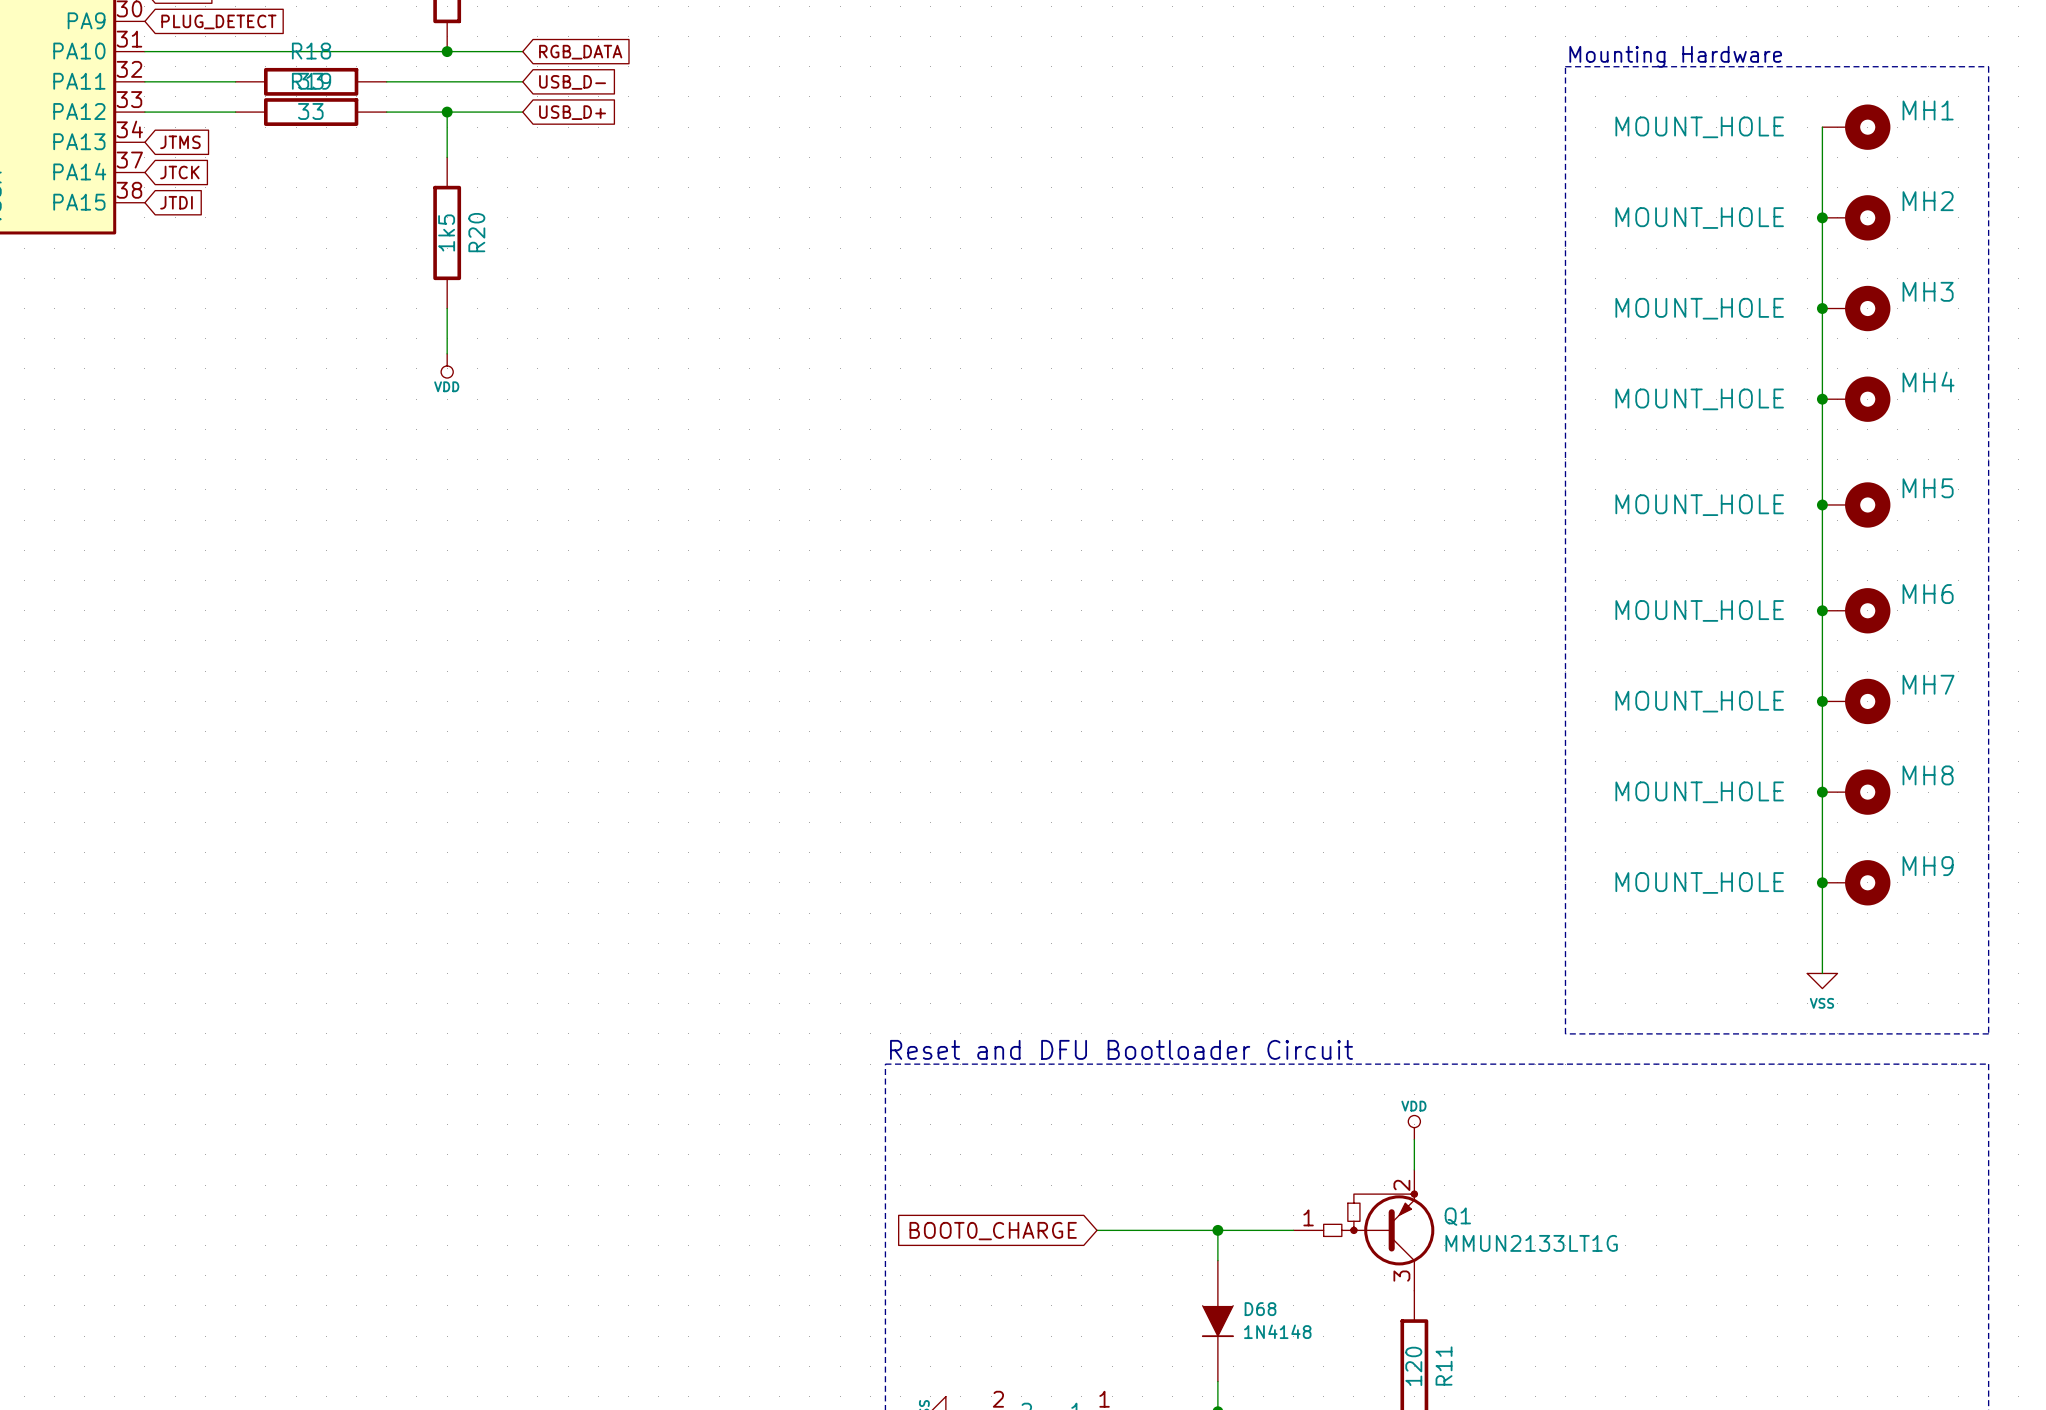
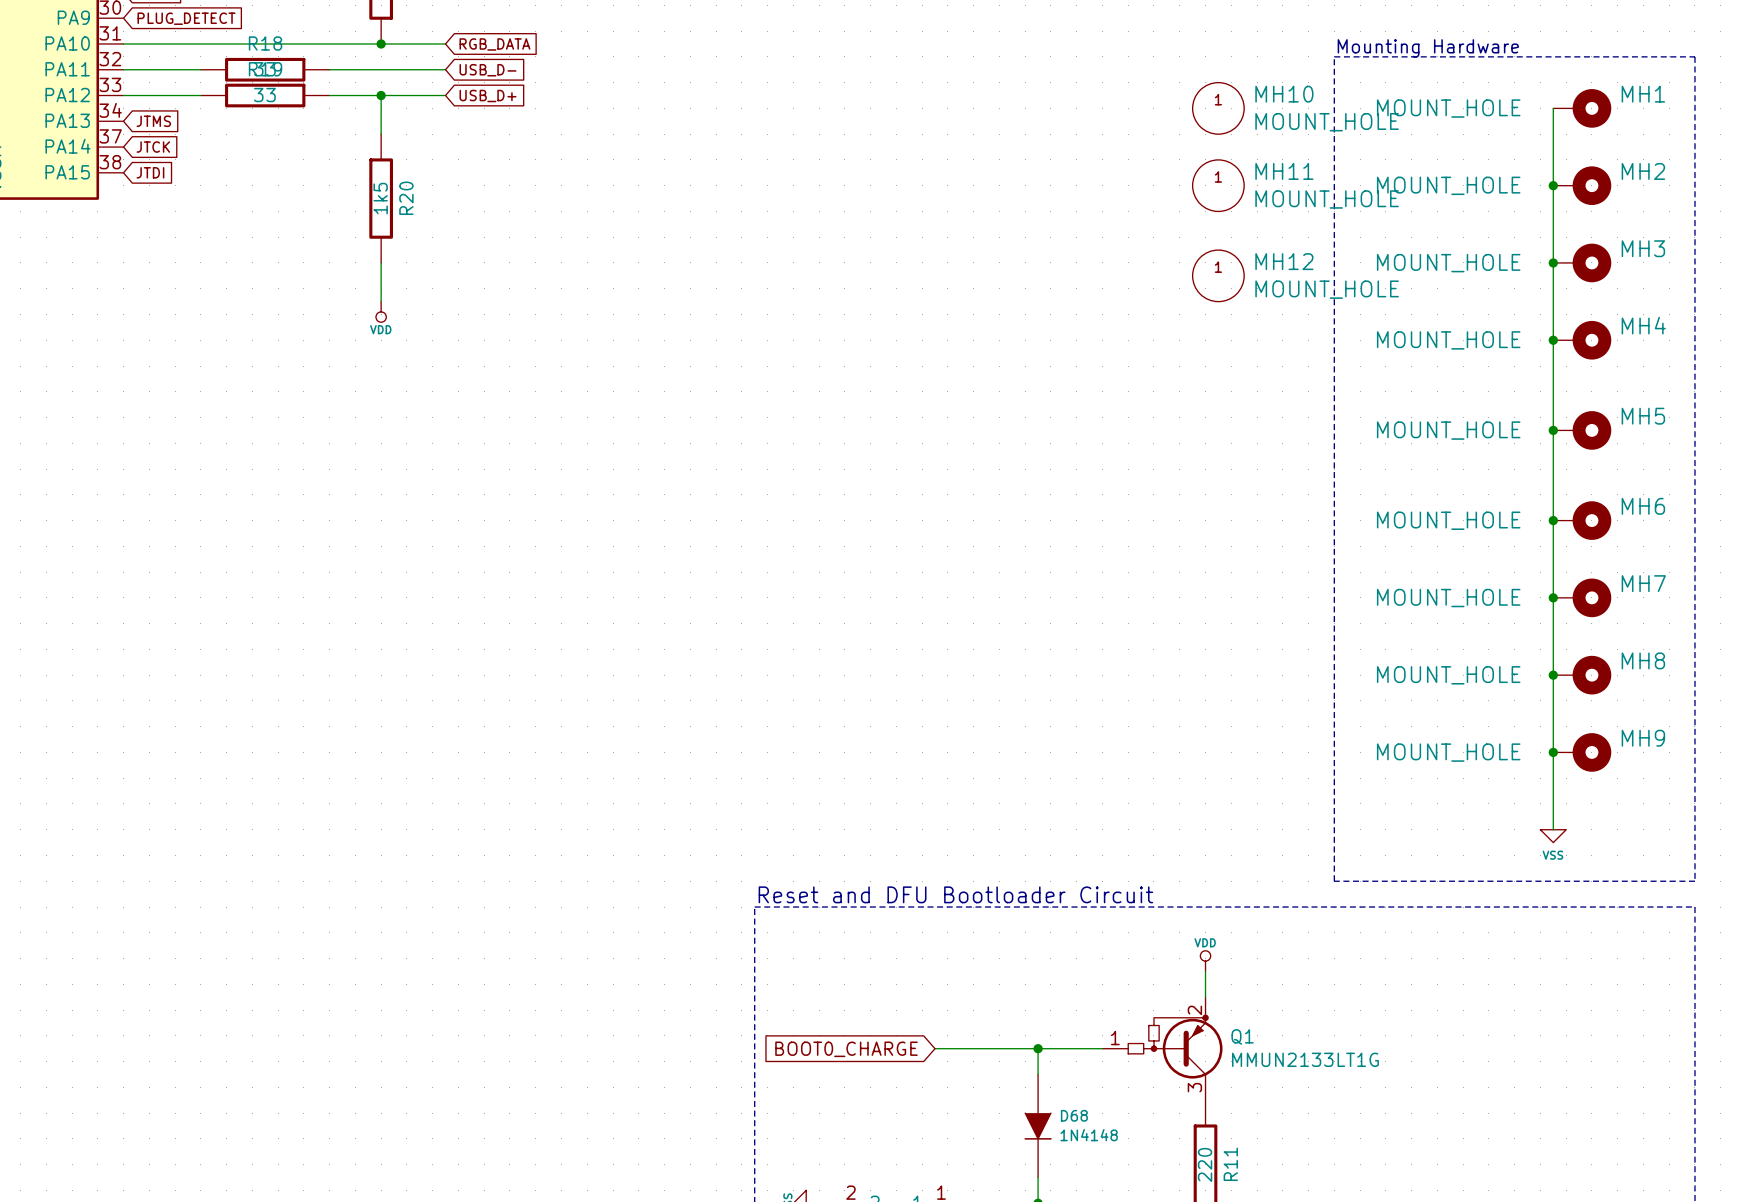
MH10: none -> MOUNT_HOLE (1218, 108)
MH11: none -> MOUNT_HOLE (1218, 185)
MH12: none -> MOUNT_HOLE (1218, 275)
R11 value: 120 (1413, 1366) -> 220 (1205, 1164)

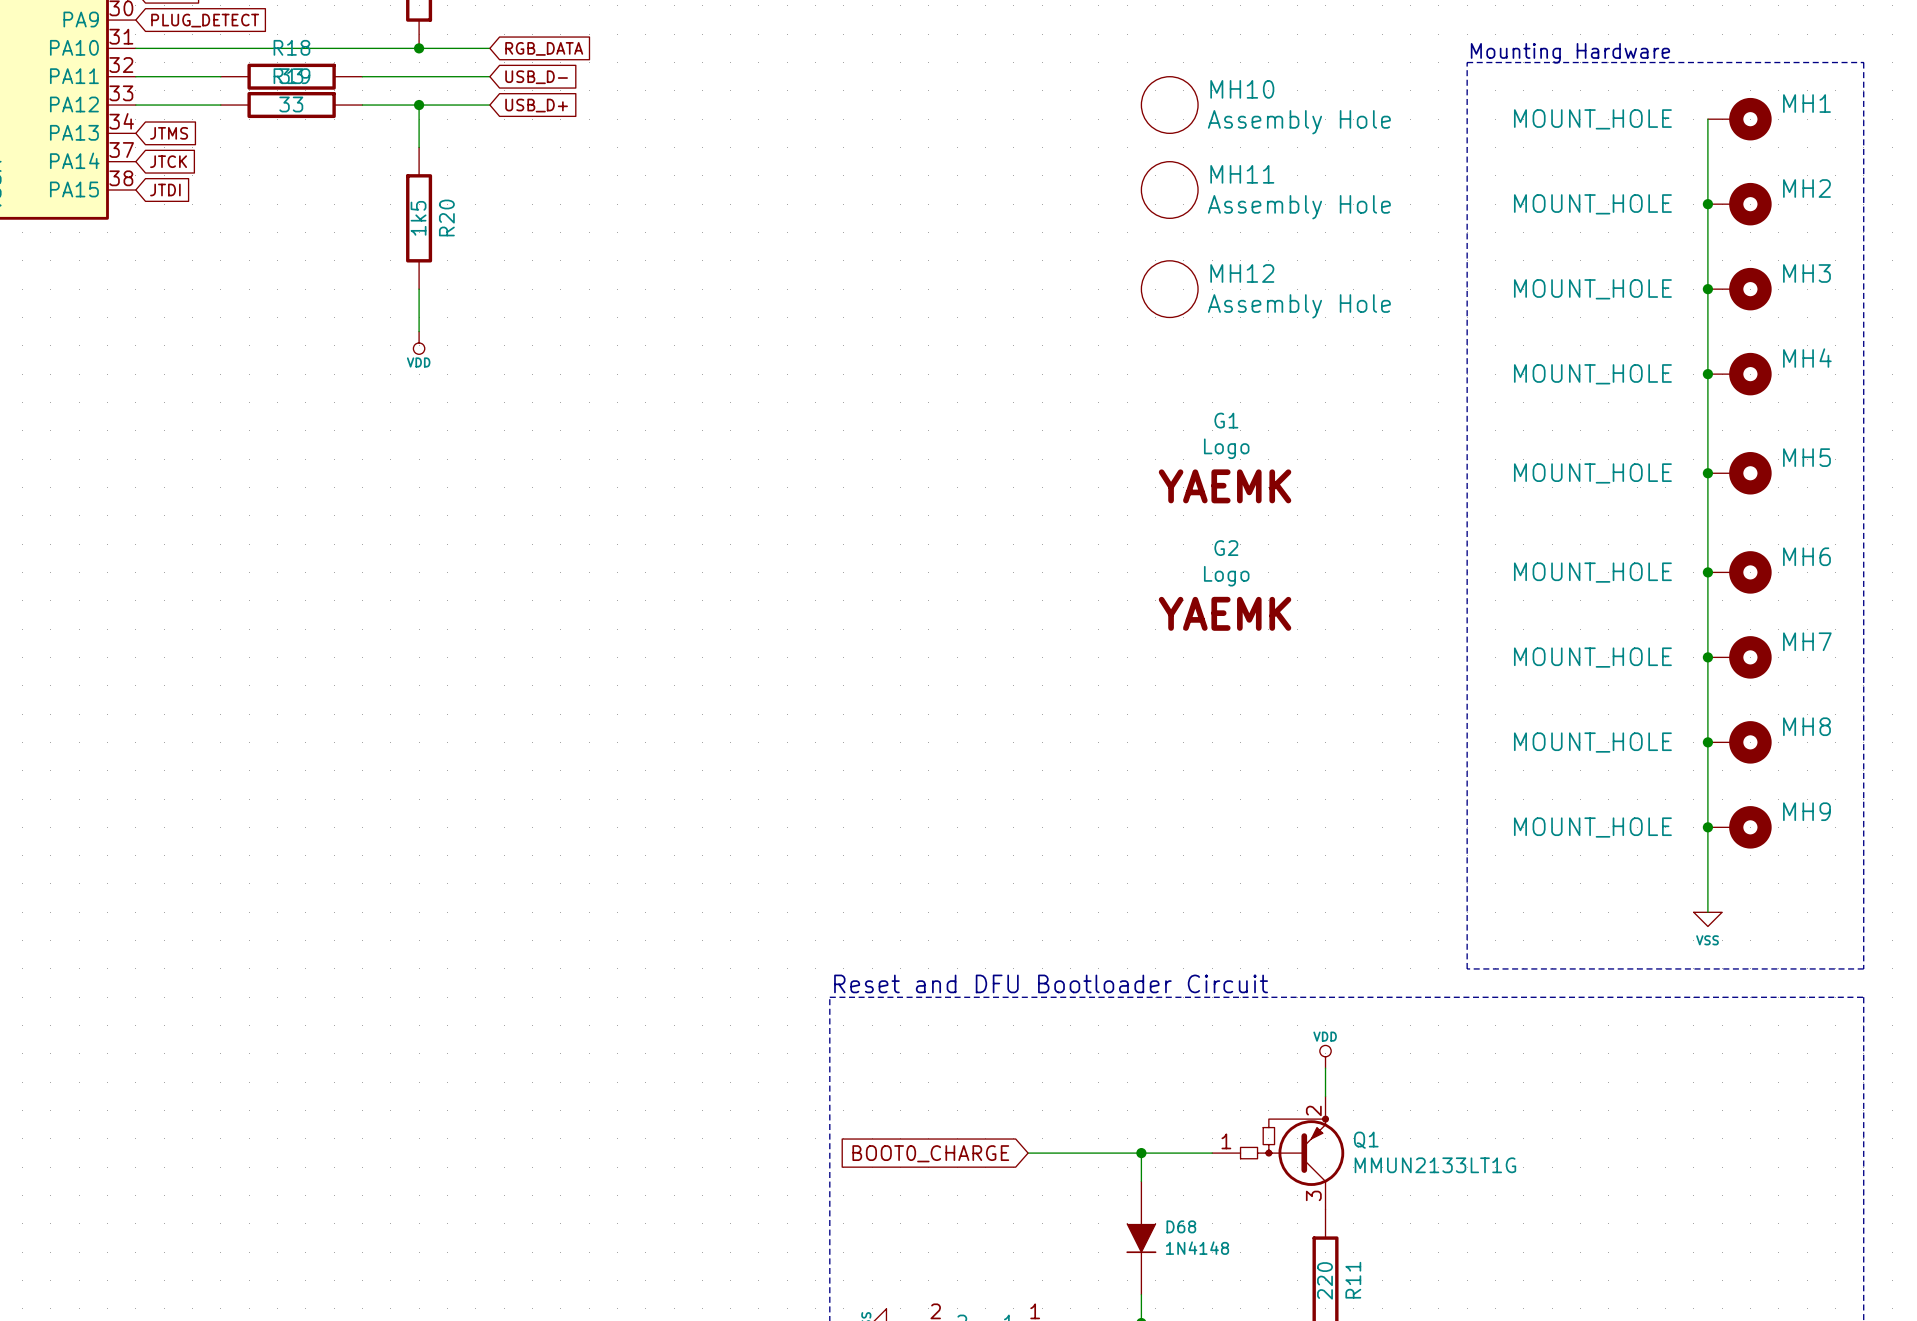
MH10 pin number: 1 (1218, 99) -> none
MH10 position: (1218, 108) -> (1169, 105)
MH10 value: MOUNT_HOLE (1327, 122) -> Assembly Hole (1299, 122)
MH11 pin number: 1 (1218, 176) -> none
MH11 position: (1218, 185) -> (1169, 190)
MH11 value: MOUNT_HOLE (1327, 199) -> Assembly Hole (1299, 207)
MH12 pin number: 1 (1218, 267) -> none
MH12 position: (1218, 275) -> (1169, 289)
MH12 value: MOUNT_HOLE (1327, 289) -> Assembly Hole (1299, 306)
G1: none -> Logo (1225, 458)
G2: none -> Logo (1225, 585)

